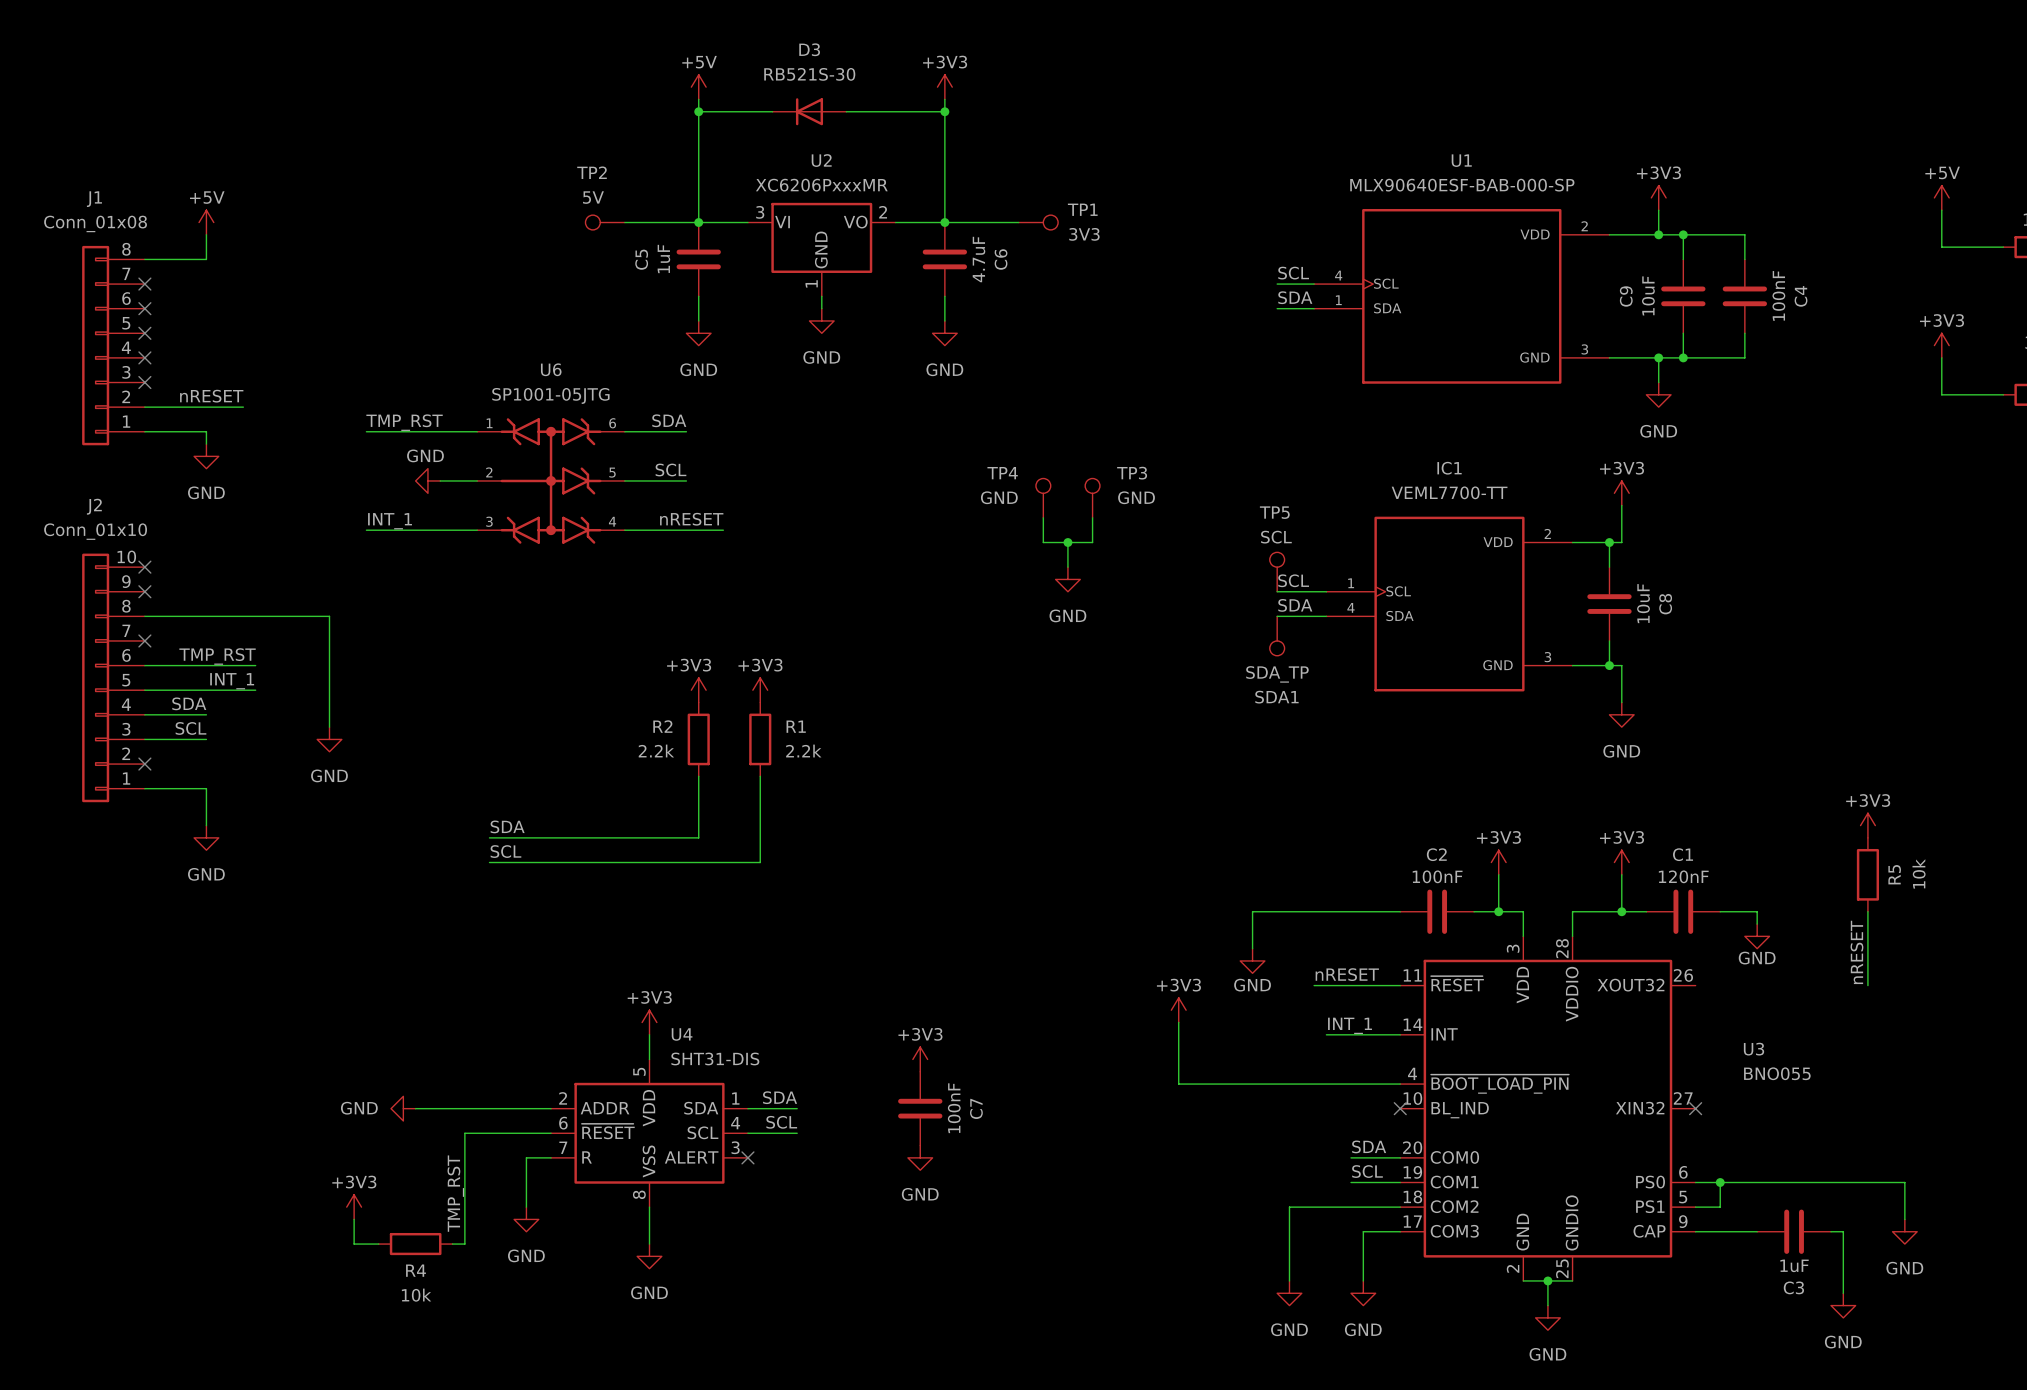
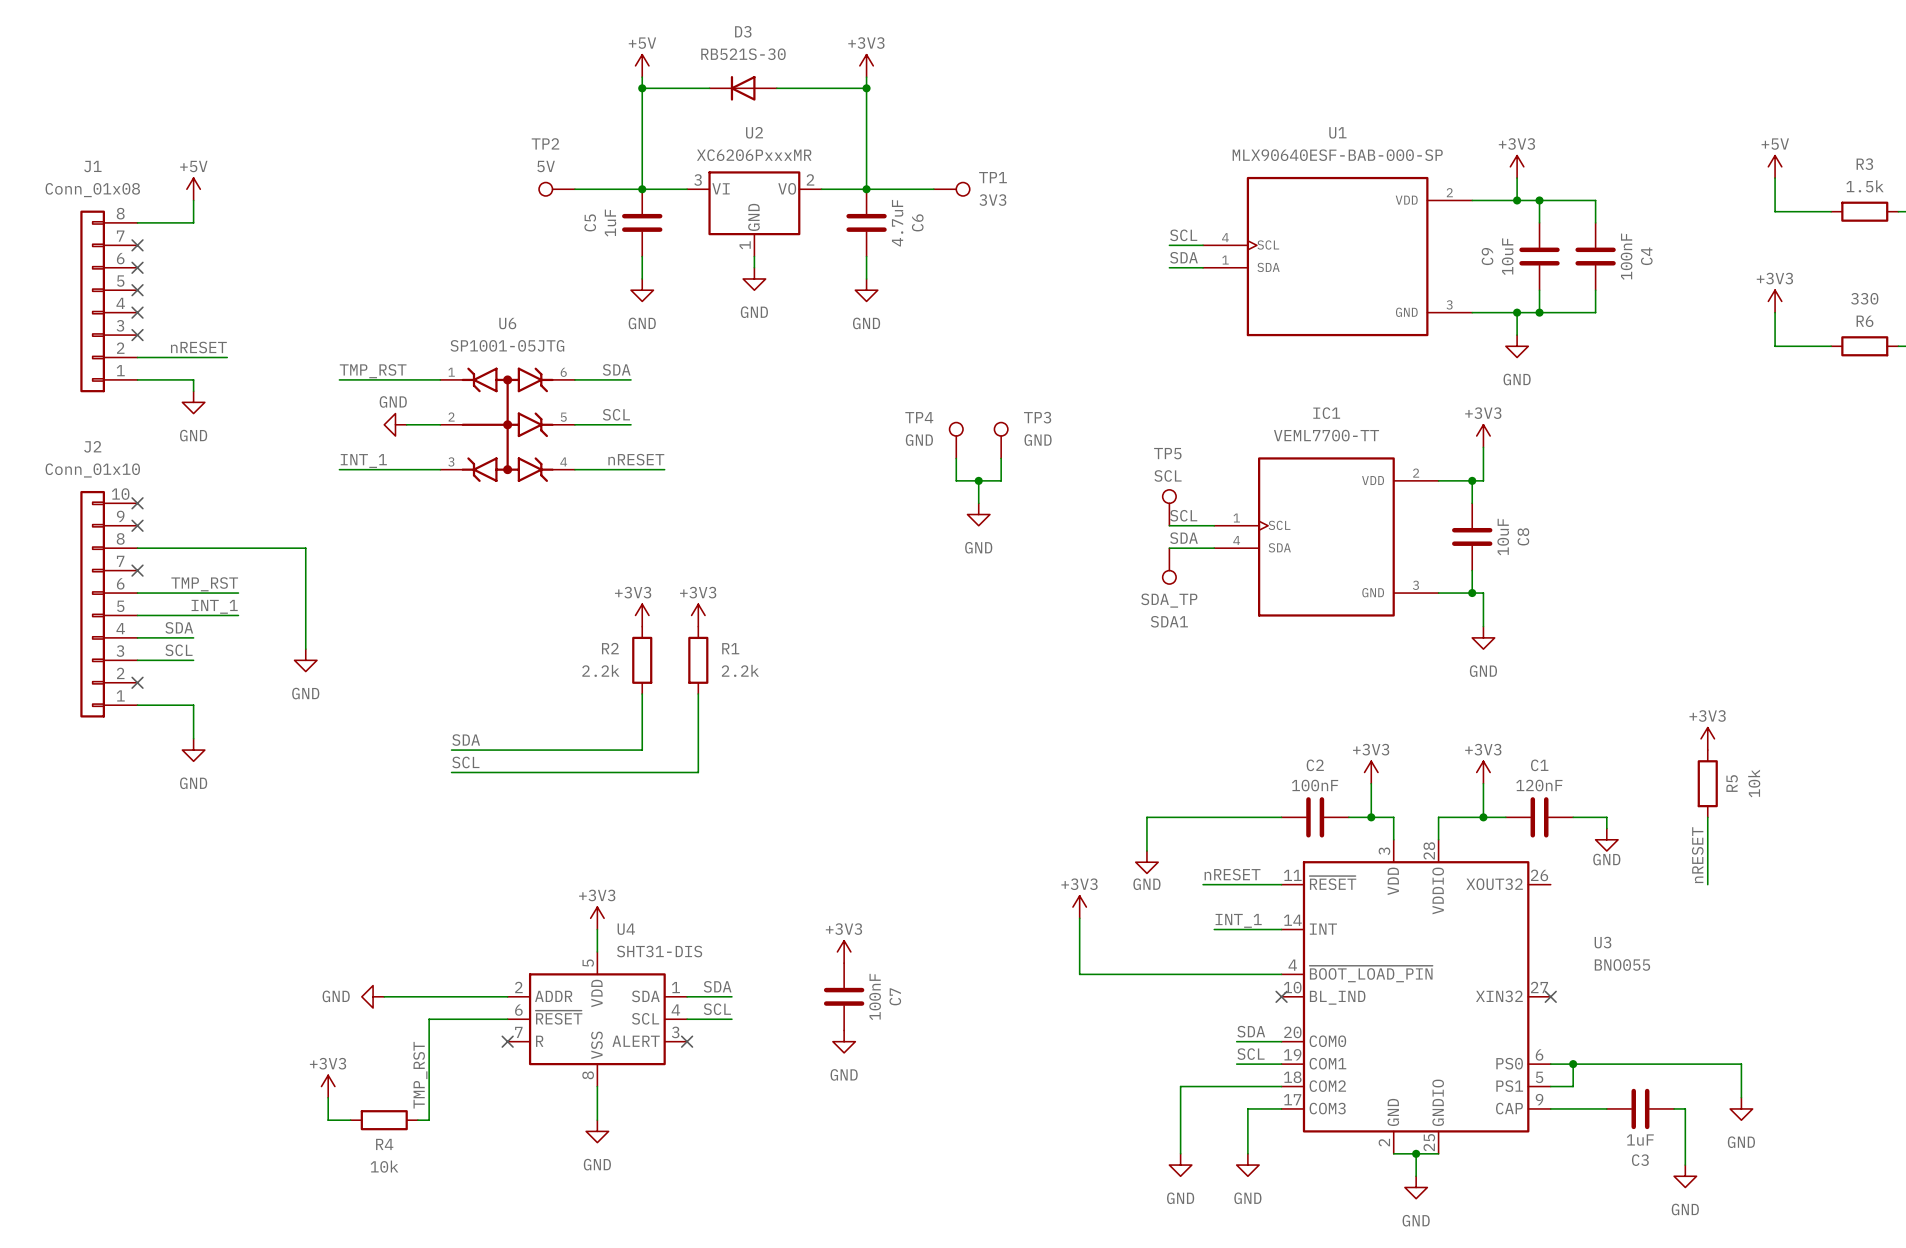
wire: (551, 1157) (526, 1157) (526, 1207) -> none
no-connect mark: none -> (507, 1041)
power symbol: GND (526, 1219) -> none

